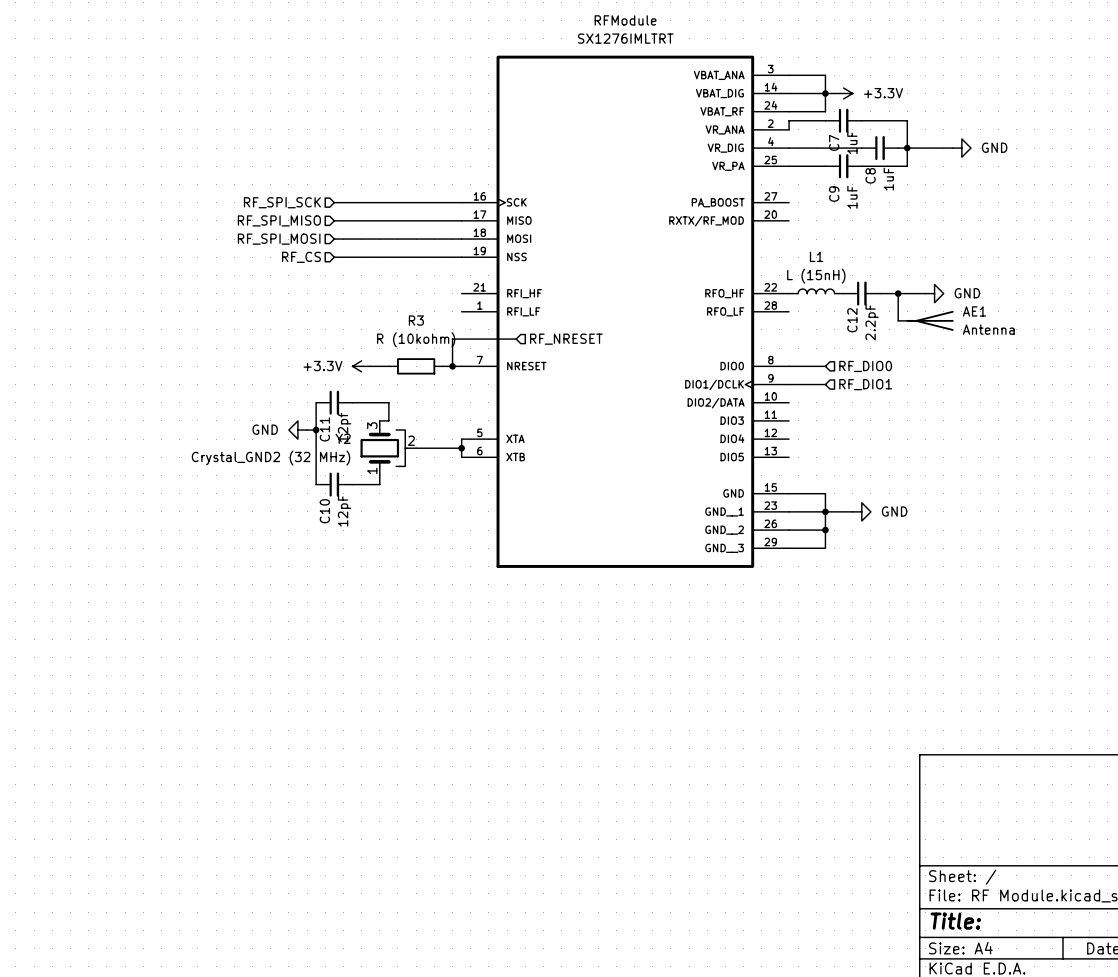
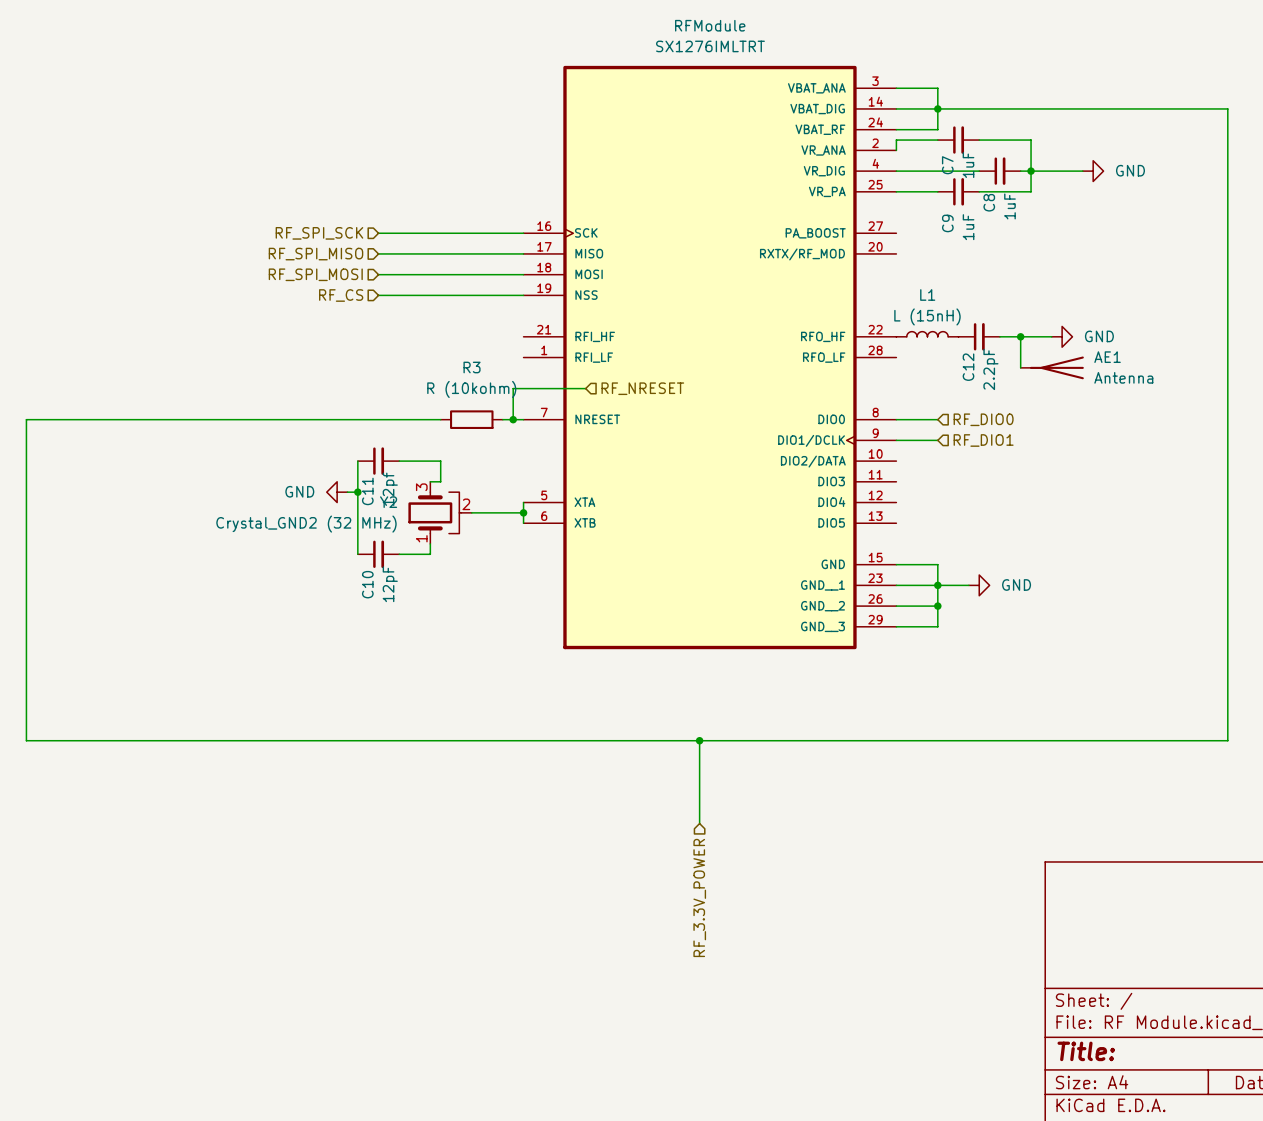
wire: none -> (948, 108) (1227, 108) (1227, 740) (26, 740) (26, 419) (419, 419)
power symbol: +3.3V (843, 93) -> none
power symbol: +3.3V (361, 366) -> none
wire: none -> (699, 740) (699, 823)
junction: none -> (699, 740)
hierarchical label: none -> RF_3.3V_POWER (699, 897)

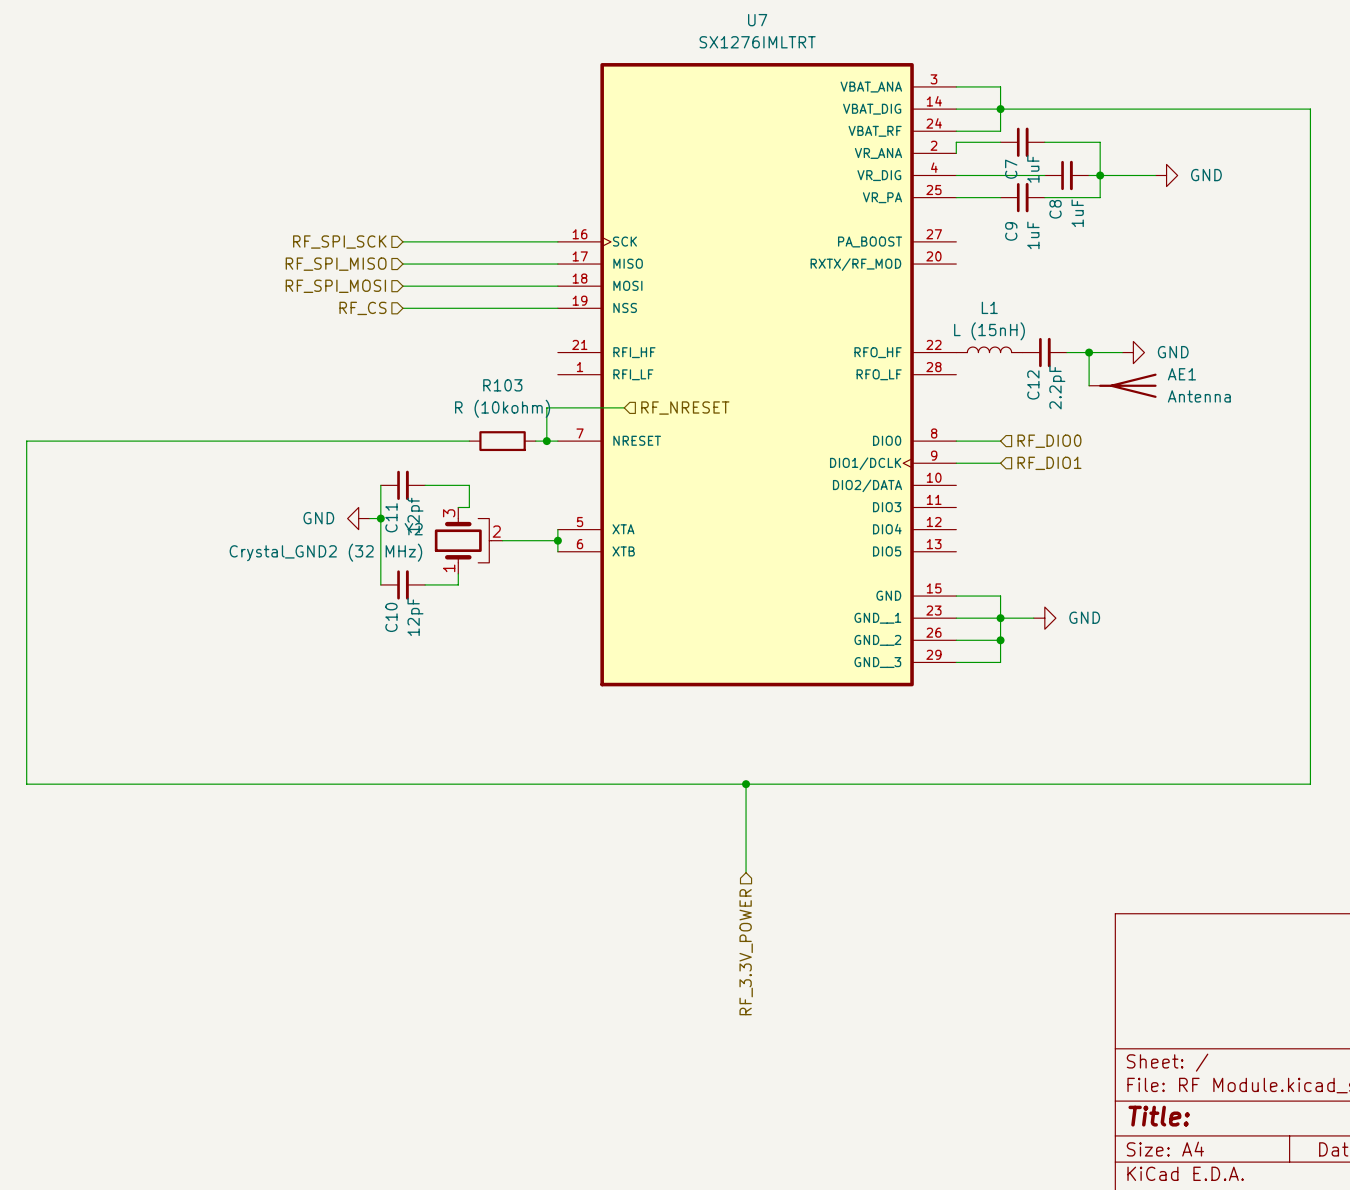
RFModule name: RFModule (710, 25) -> U7 (757, 20)
R3 name: R3 (472, 367) -> R103 (502, 385)

